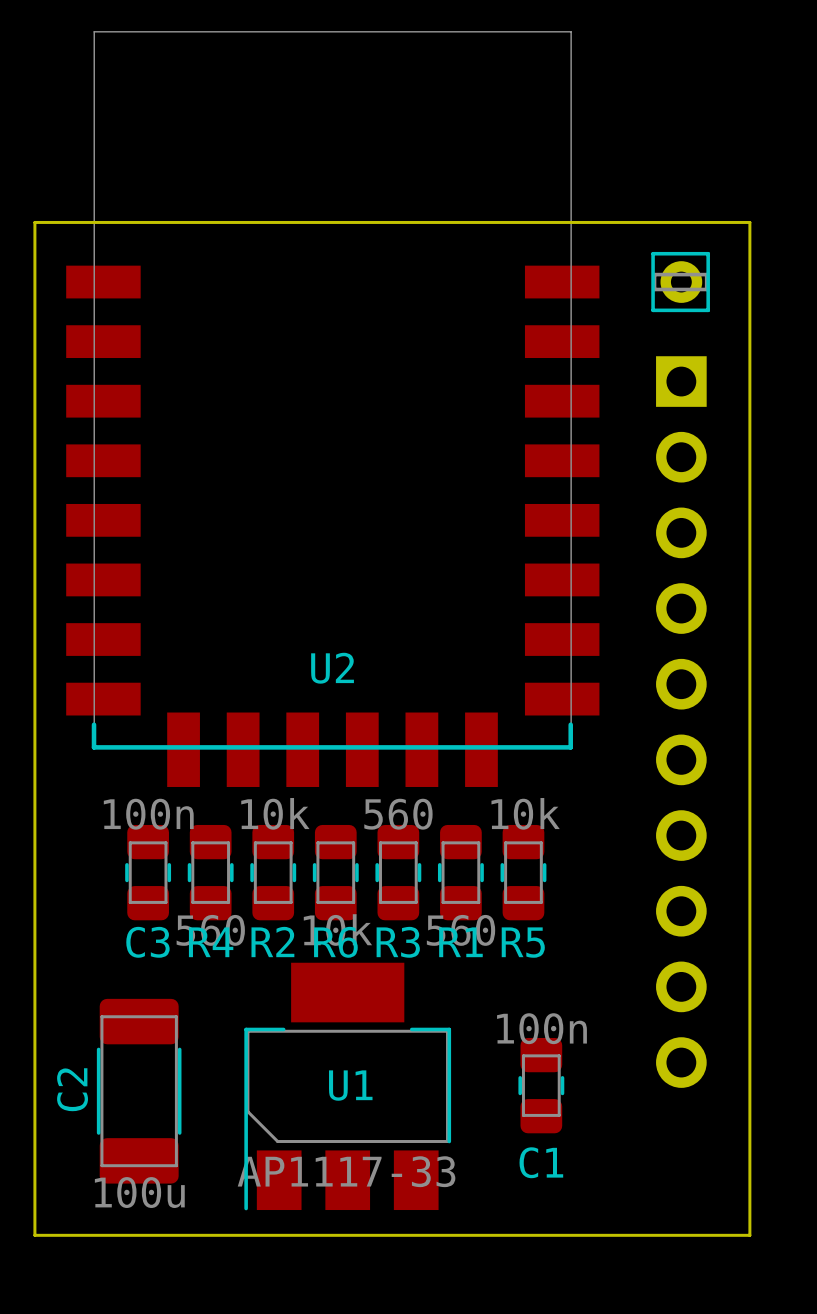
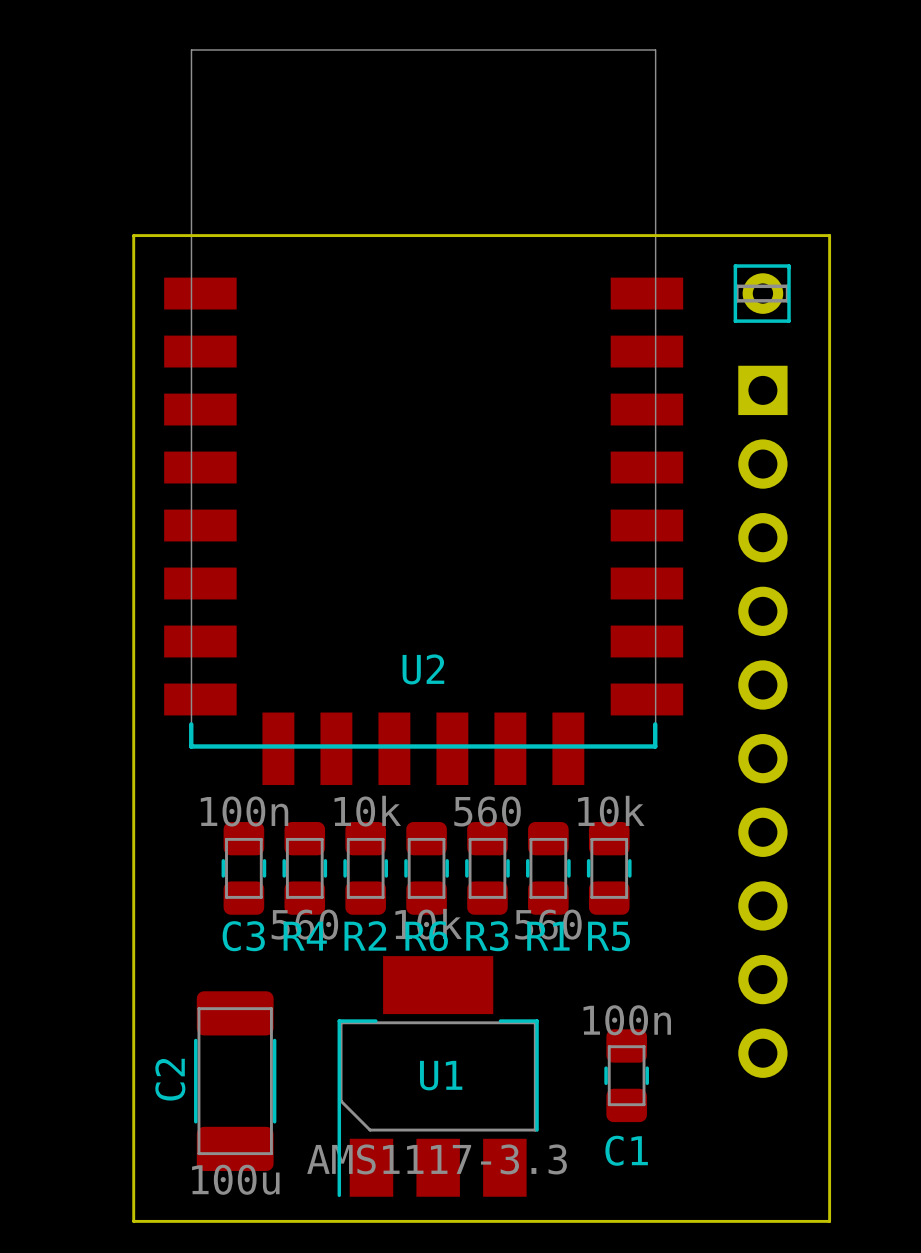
U1 value: AP1117-33 (346, 1171) -> AMS1117-3.3 (437, 1159)

